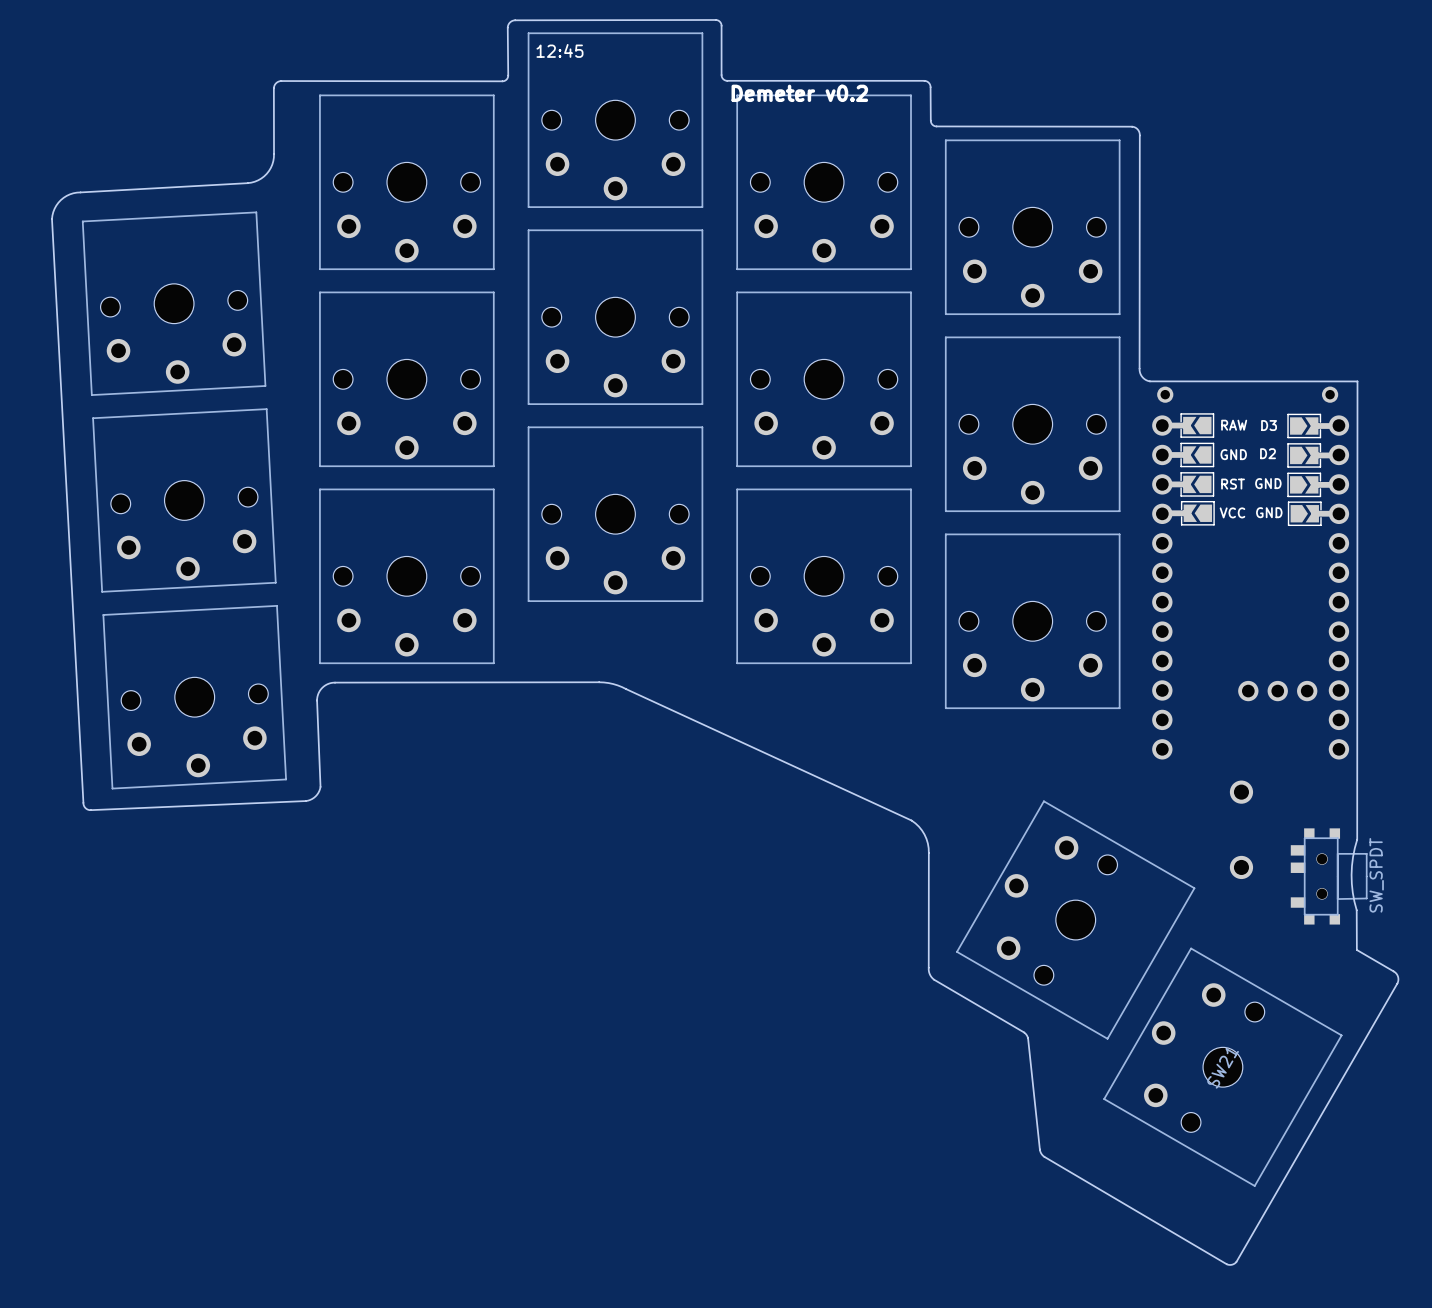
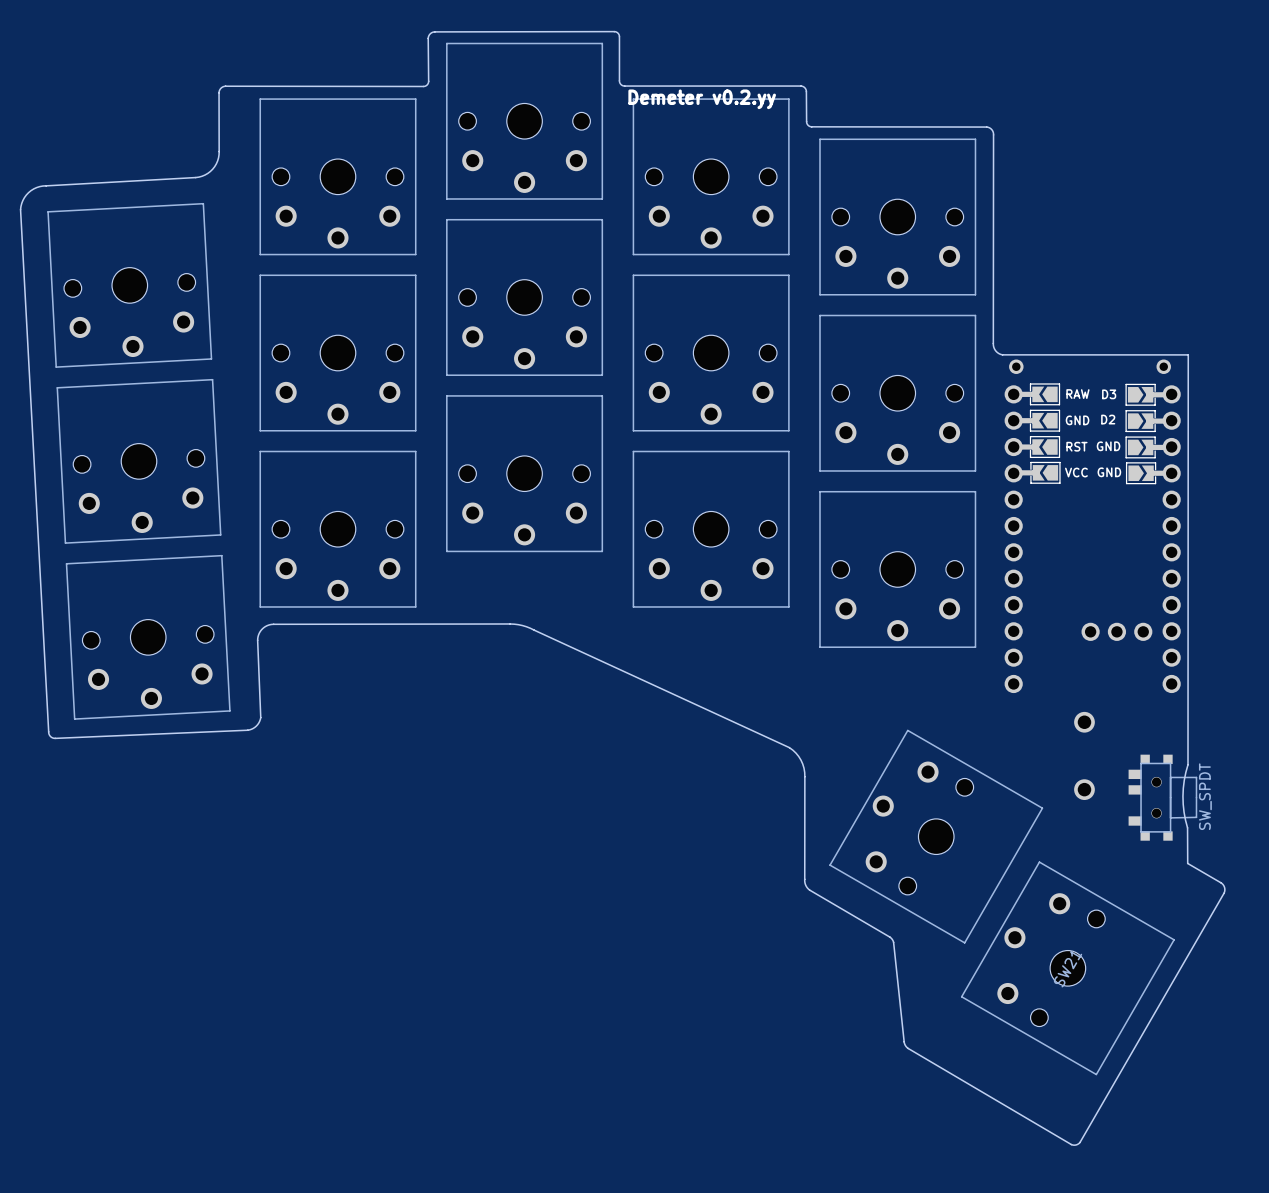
text: 12:45 (559, 50) -> none
text: Demeter v0.2 (799, 93) -> Demeter v0.2.yy (702, 99)

